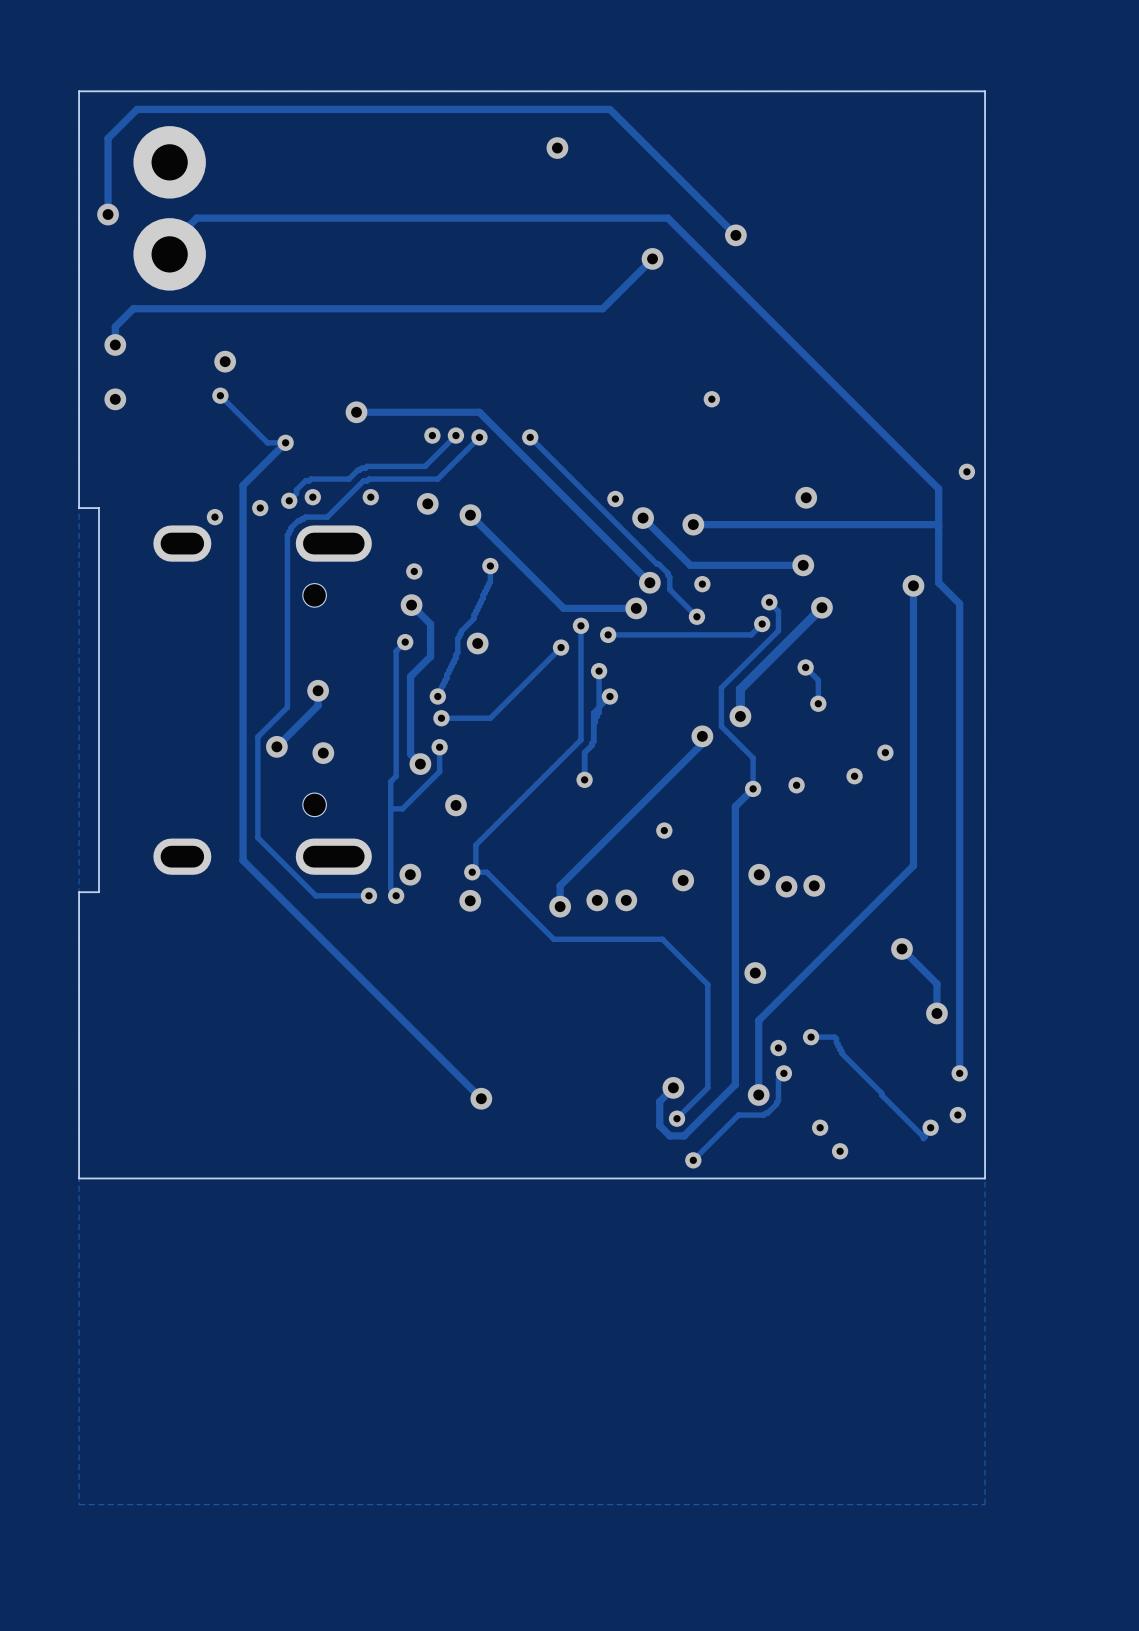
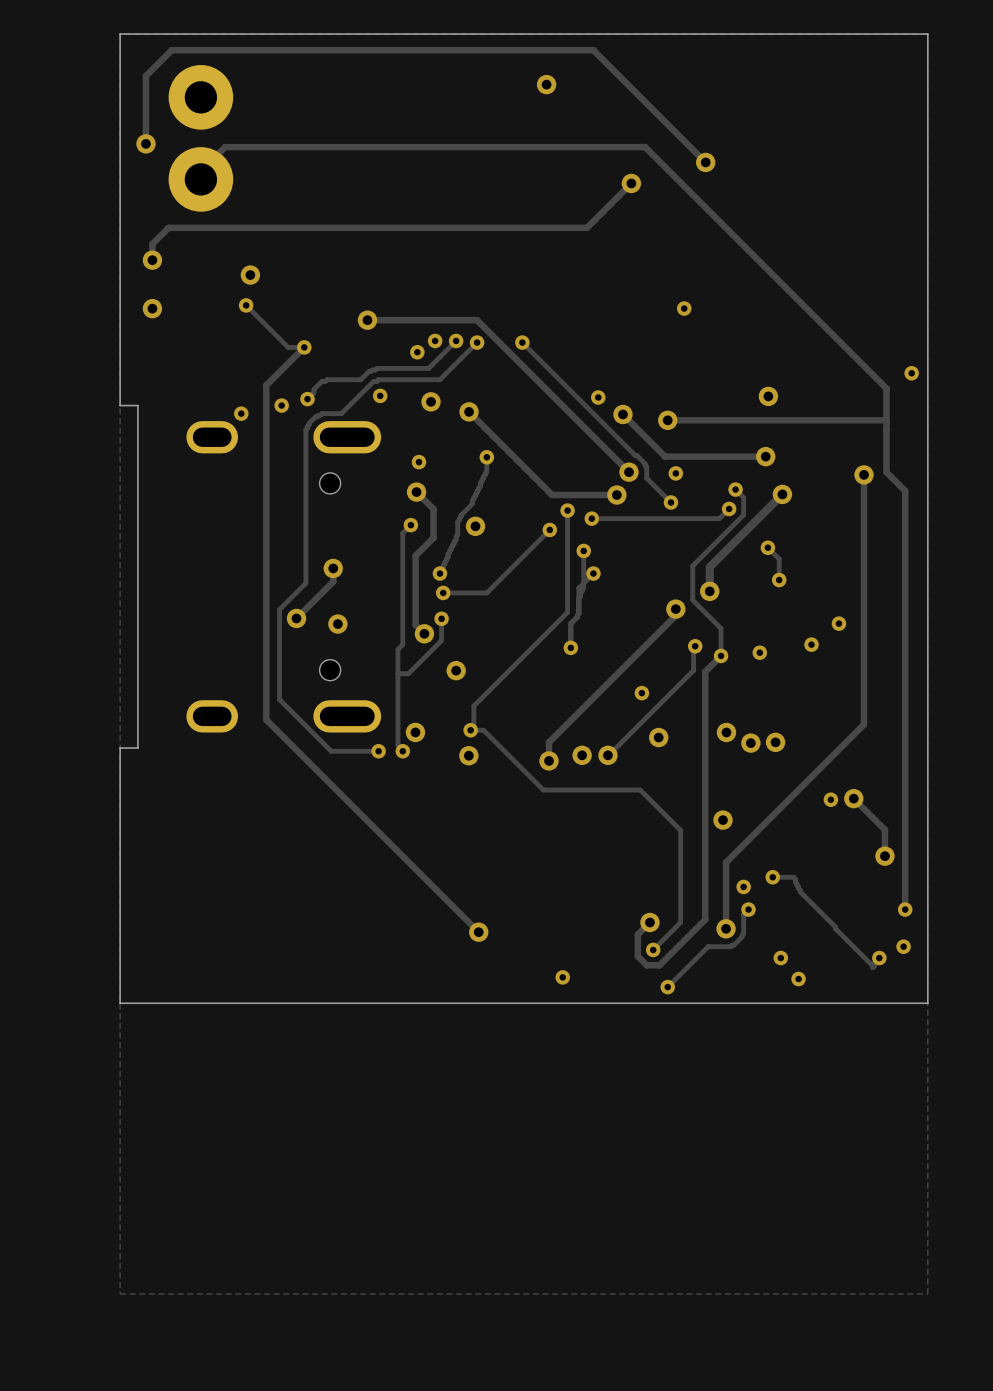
via position: (312, 497) -> (417, 352)
track: none -> (695, 646) (693, 647) (693, 670) (607, 755)
via: none -> (695, 646)
via: none -> (830, 799)
via: none -> (562, 977)

